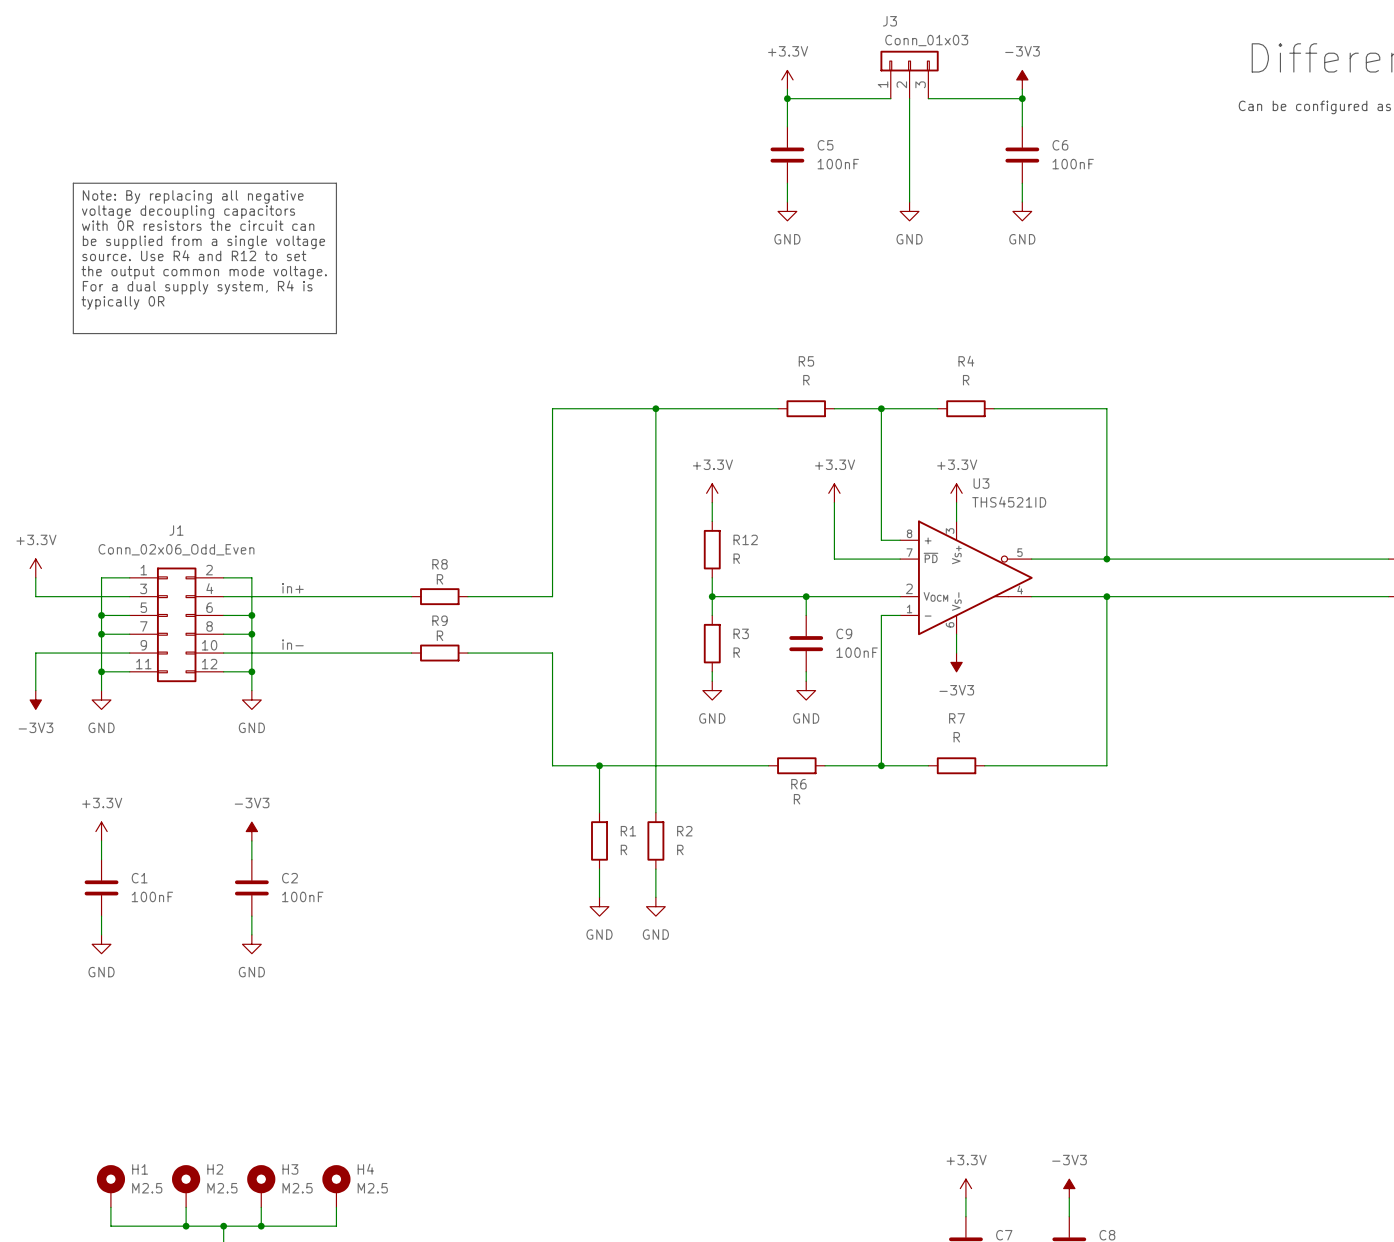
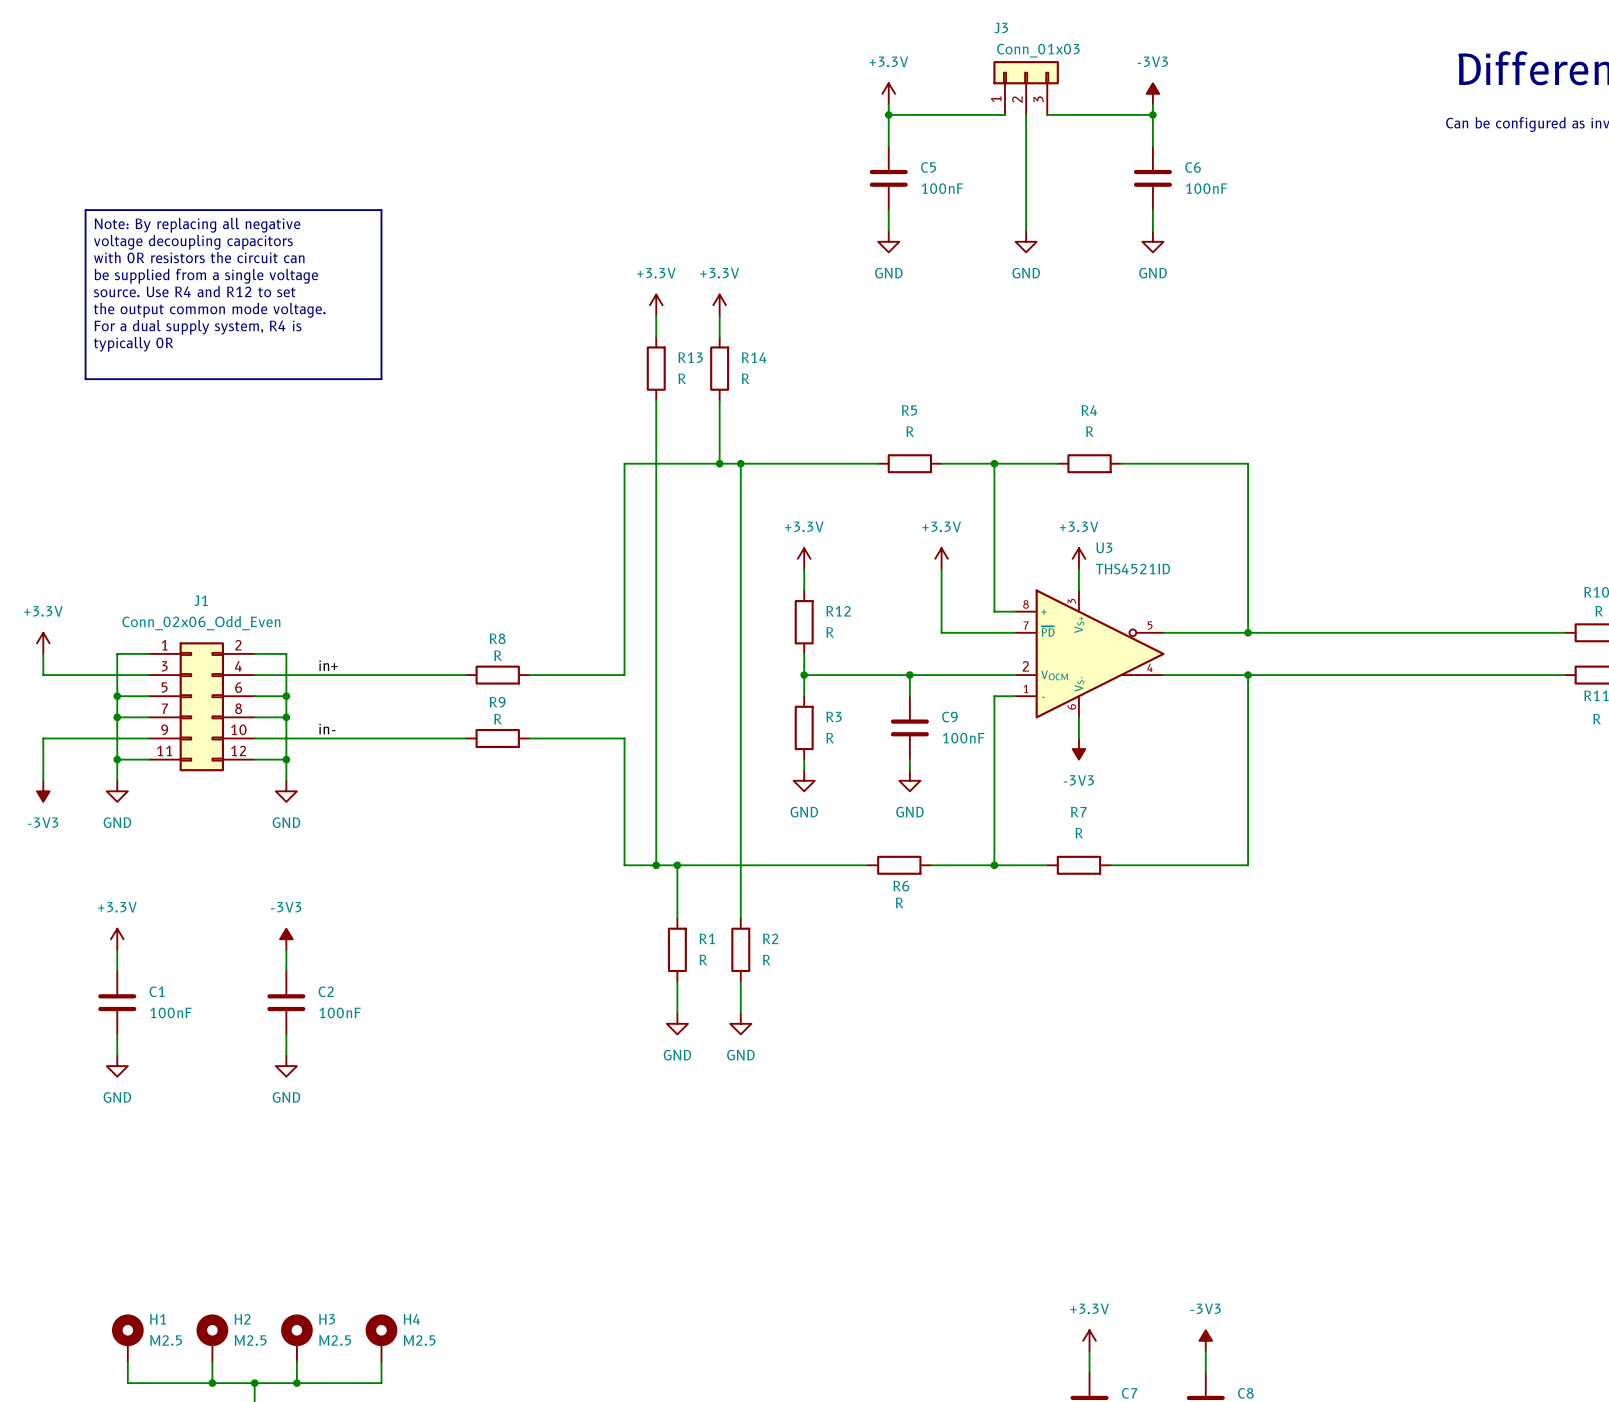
power symbol: none -> +3.3V (656, 305)
power symbol: none -> +3.3V (719, 305)
wire: none -> (656, 315) (656, 336)
wire: none -> (719, 315) (719, 336)
R13: none -> R (656, 368)
R14: none -> R (719, 368)
wire: none -> (656, 400) (656, 865)
wire: none -> (719, 400) (719, 463)
junction: none -> (719, 463)
junction: none -> (656, 865)

